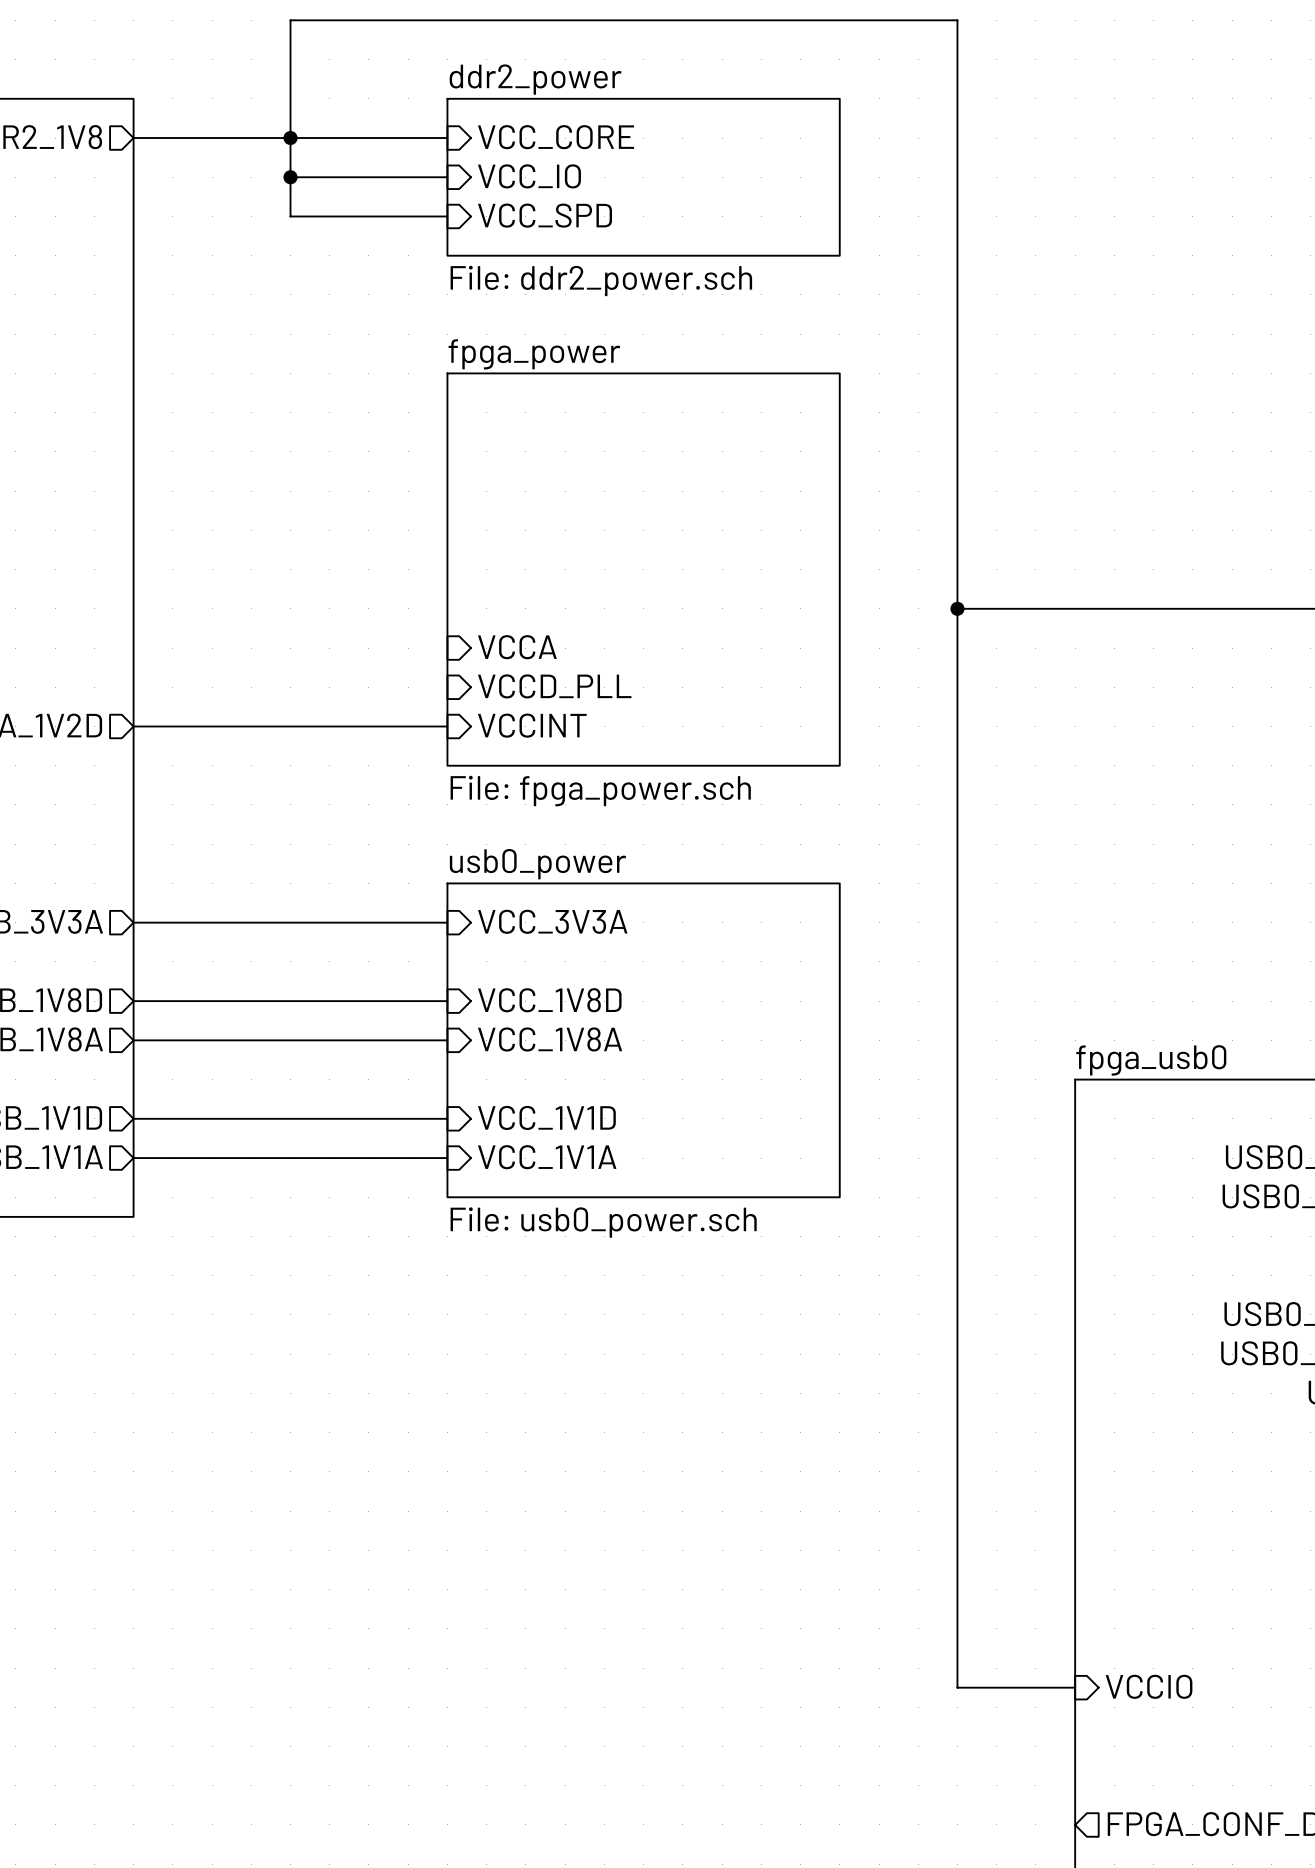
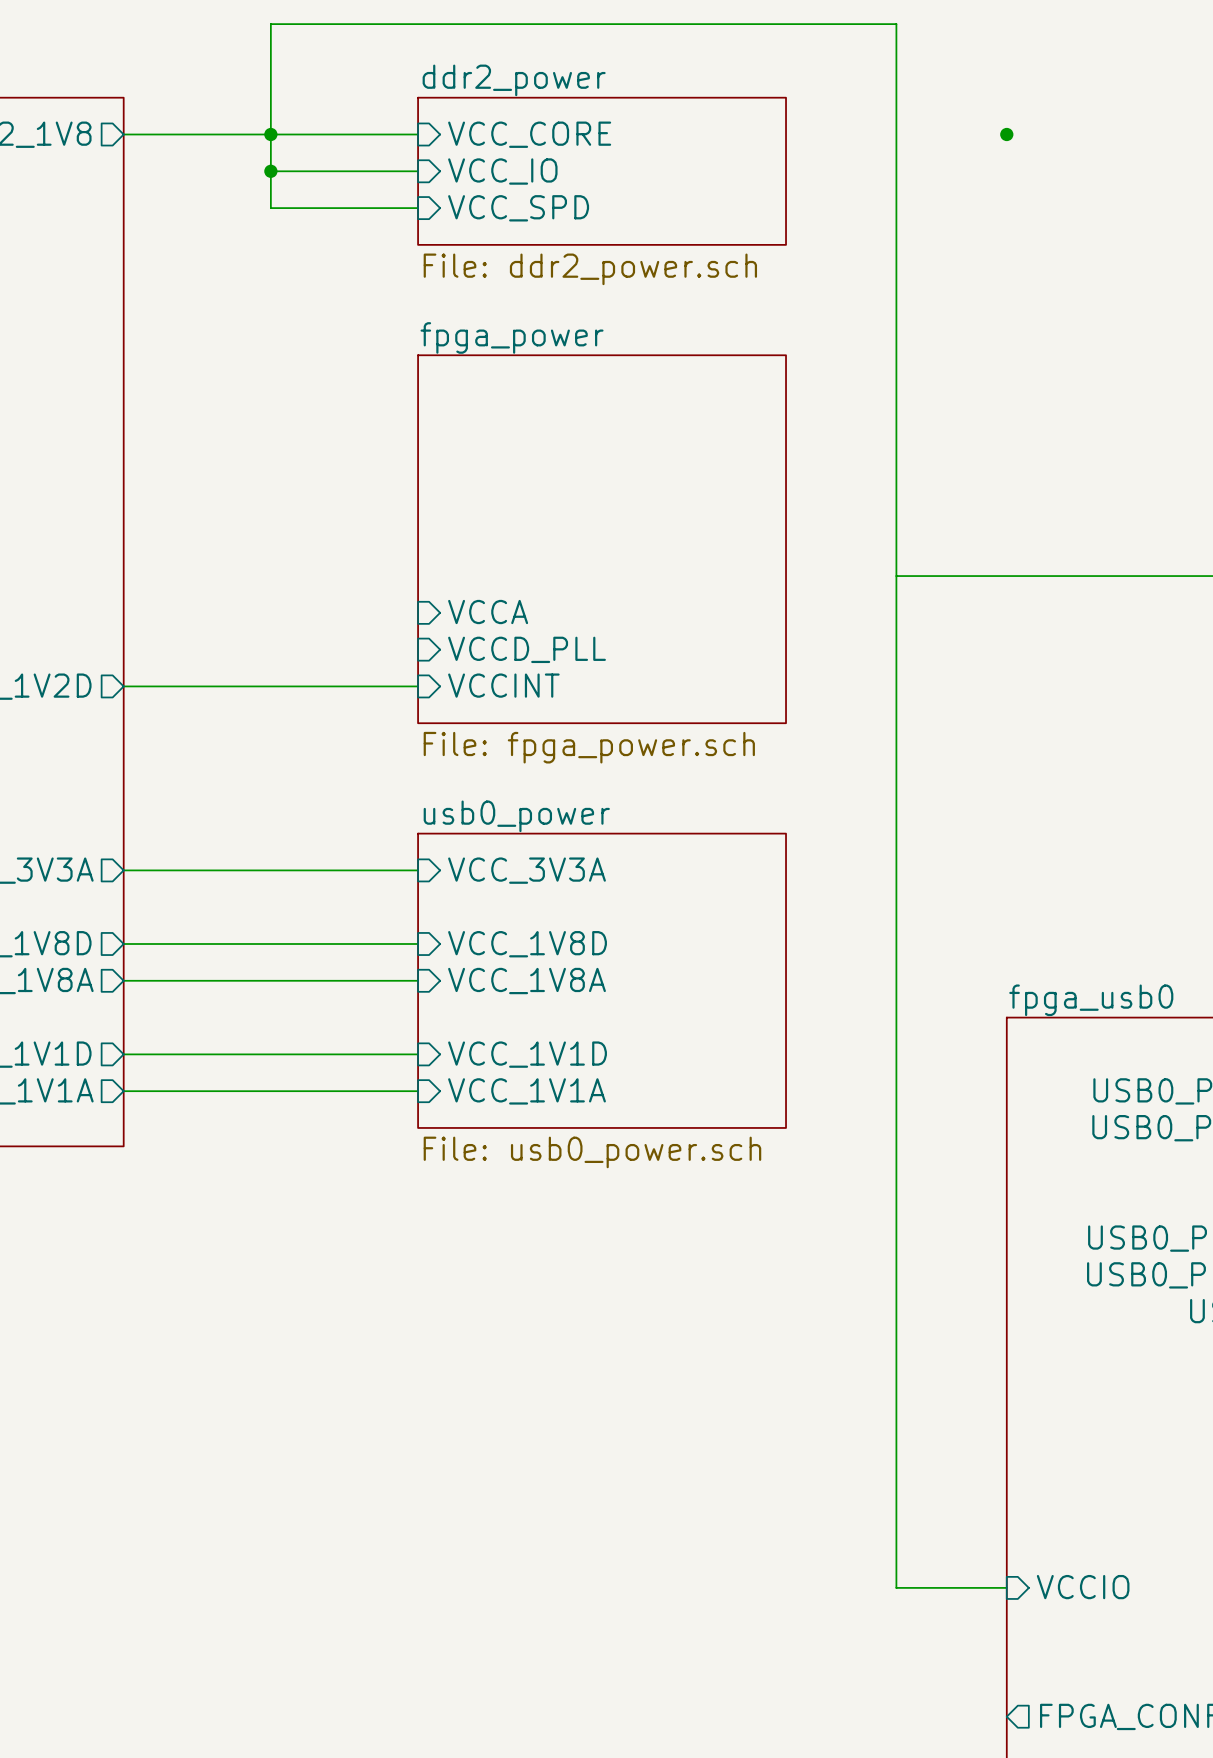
junction: none -> (1006, 134)
junction: (957, 608) -> none

